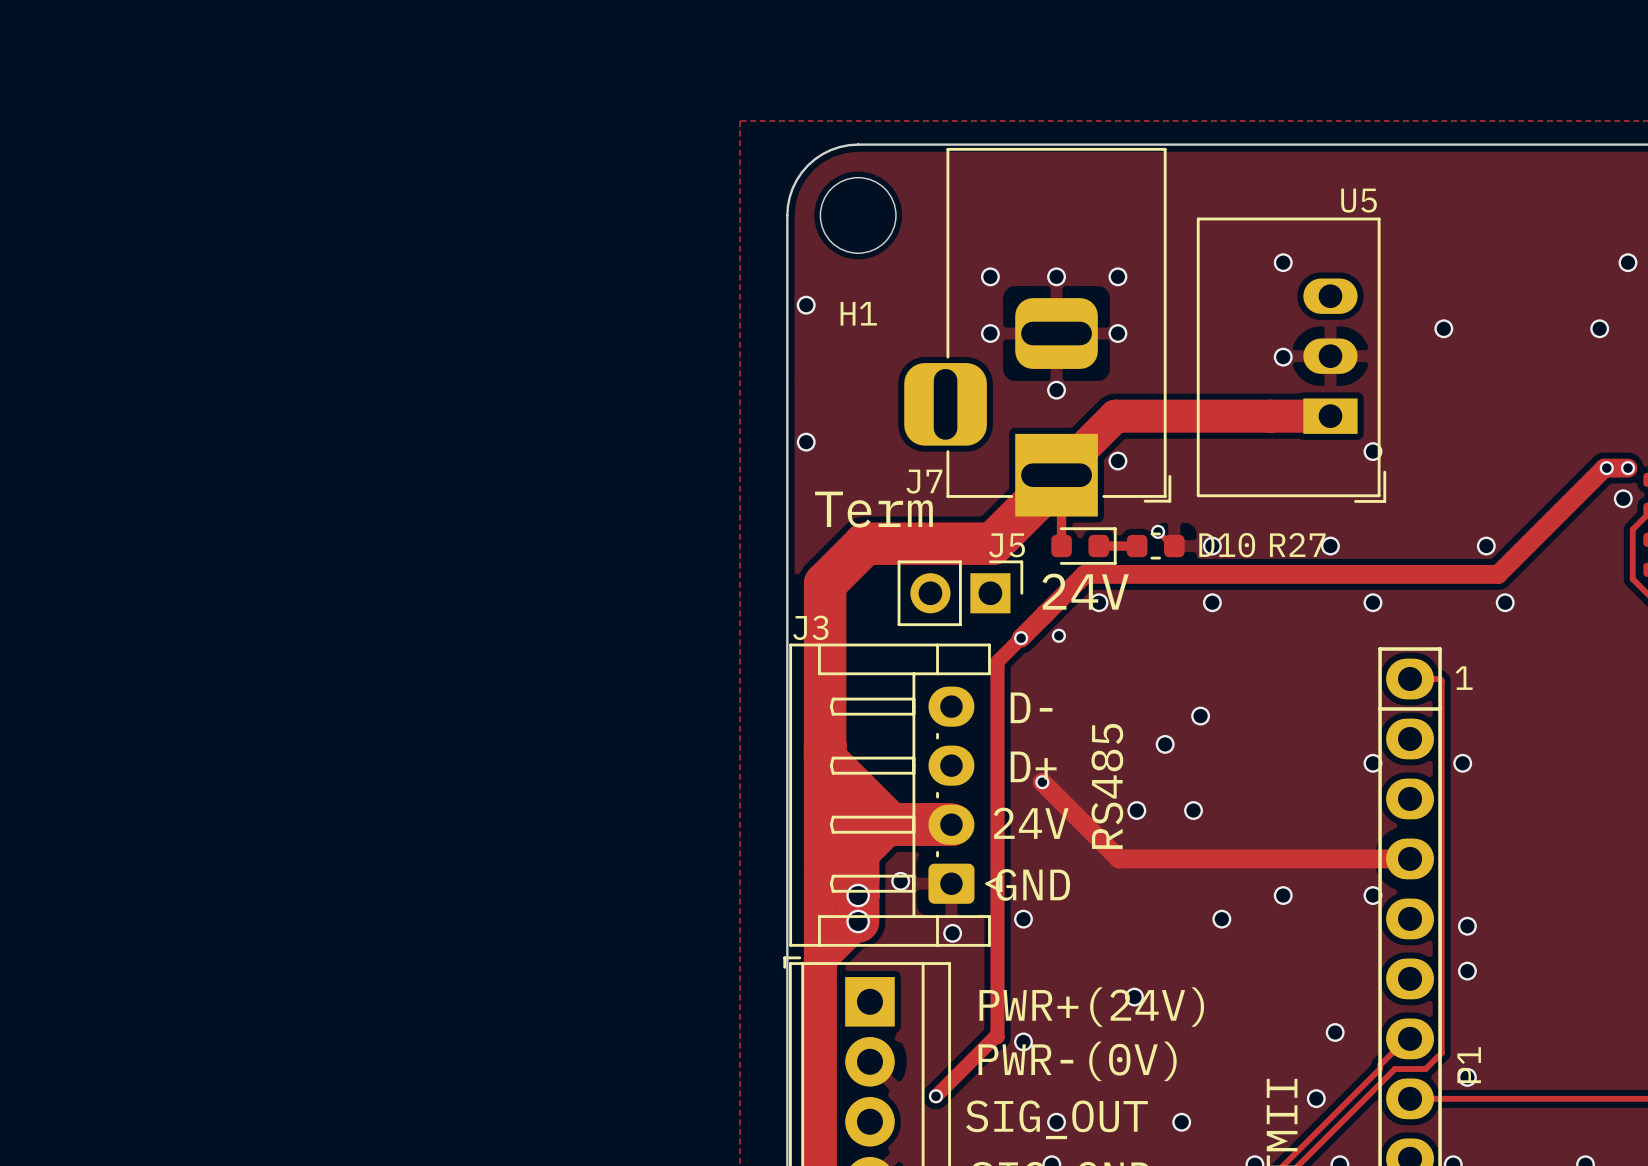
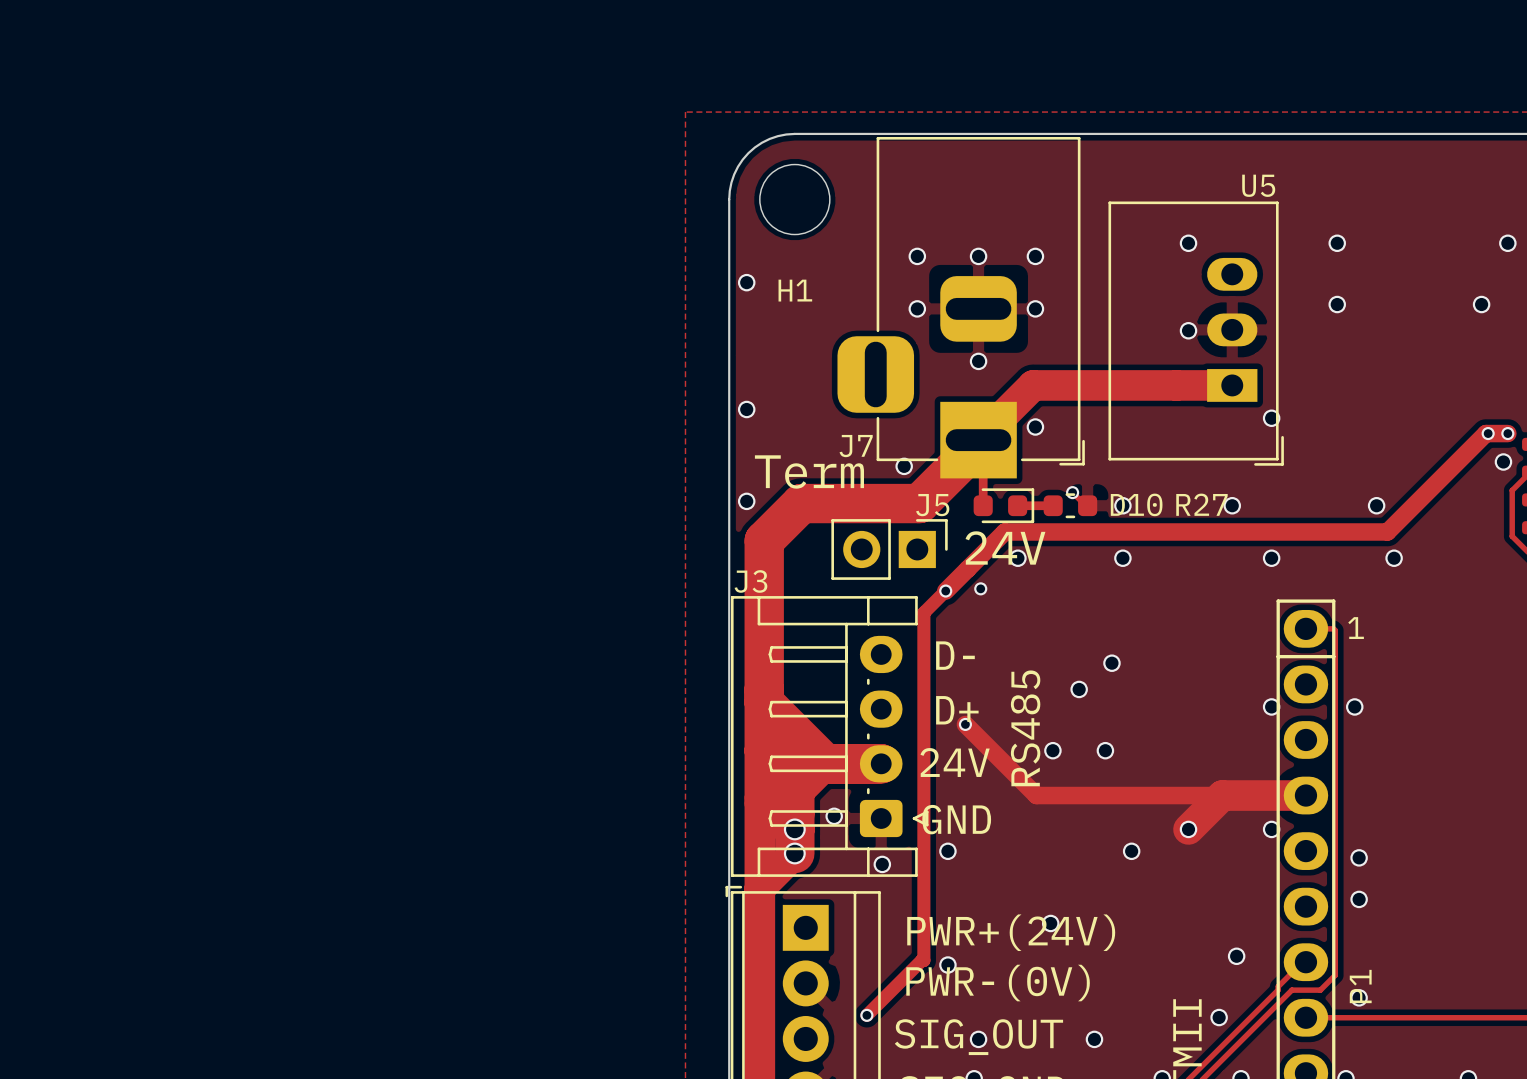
via: none -> (1337, 243)
via: none -> (904, 466)
via: none -> (746, 501)
track: none -> (1305, 795) (1222, 795) (1188, 829)

